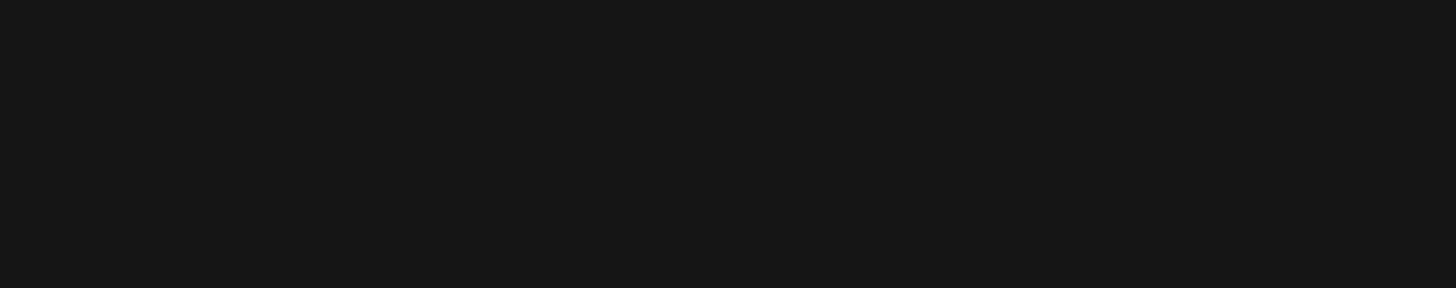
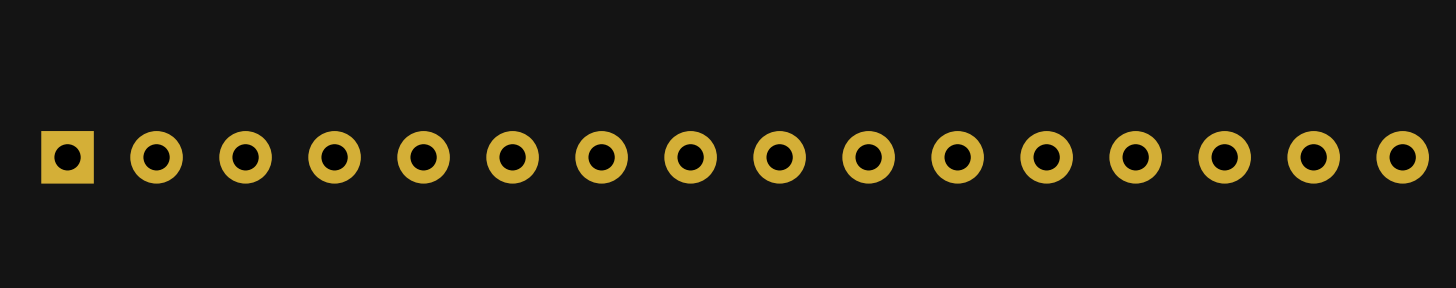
part: none -> (735, 157)

